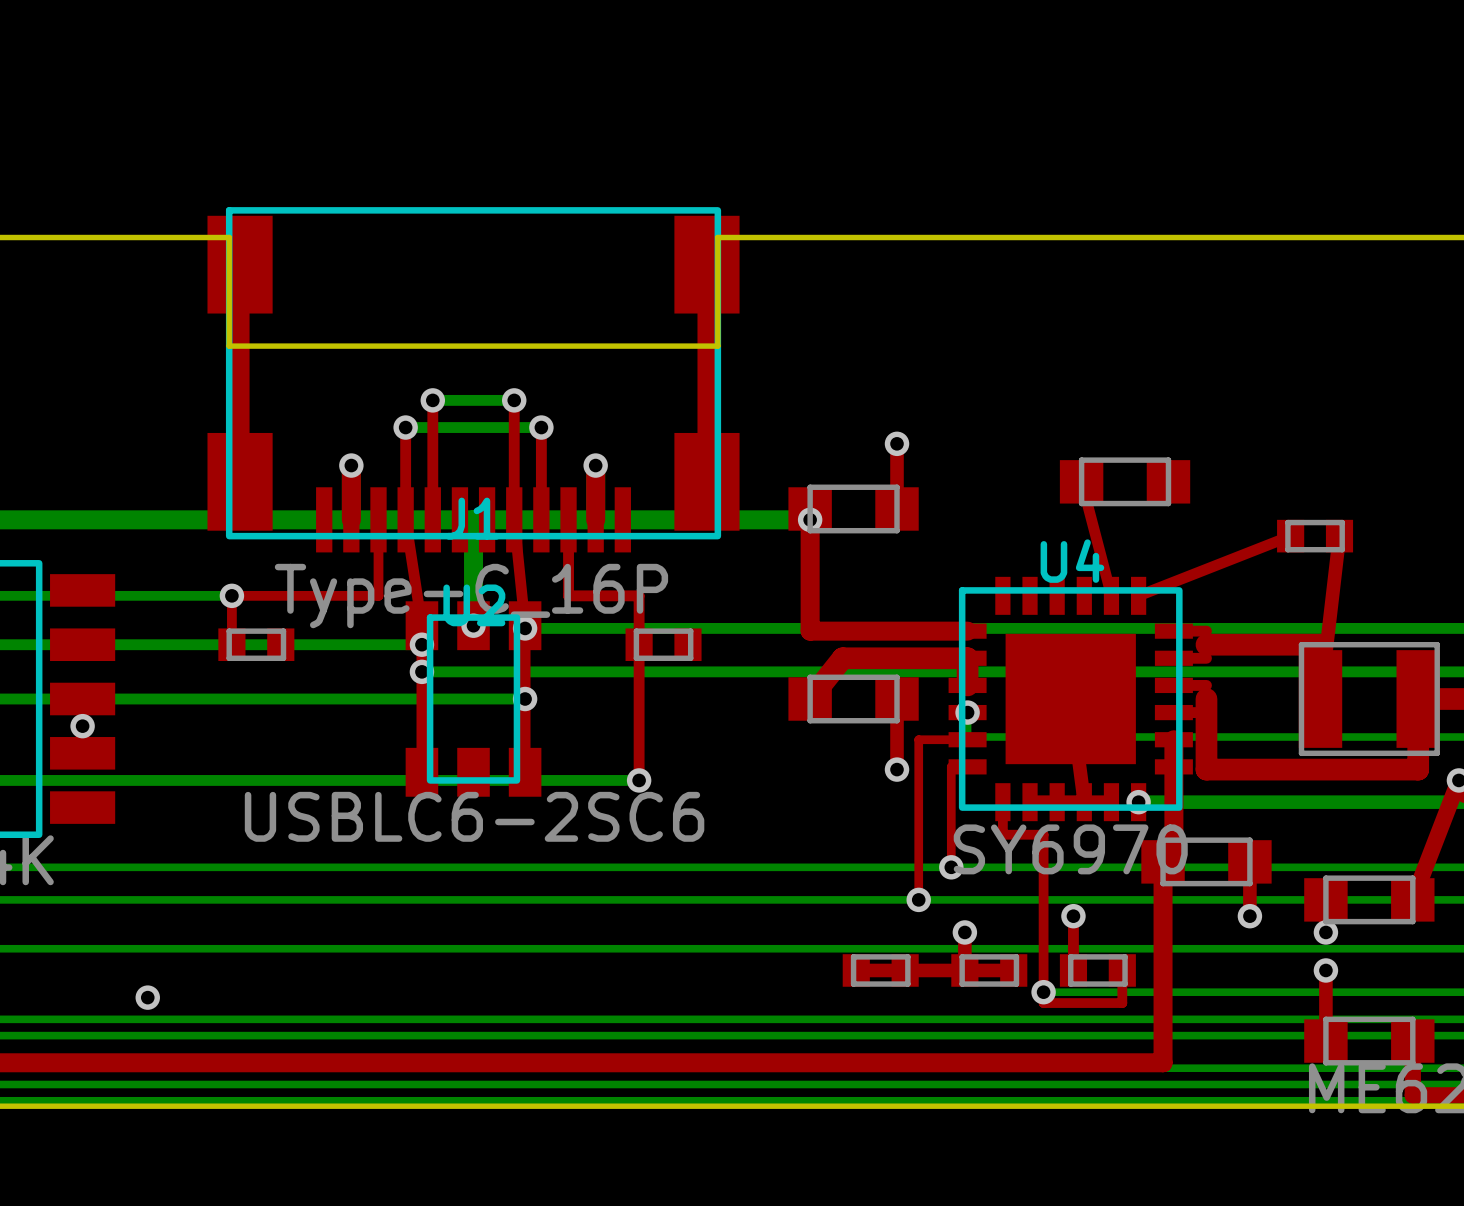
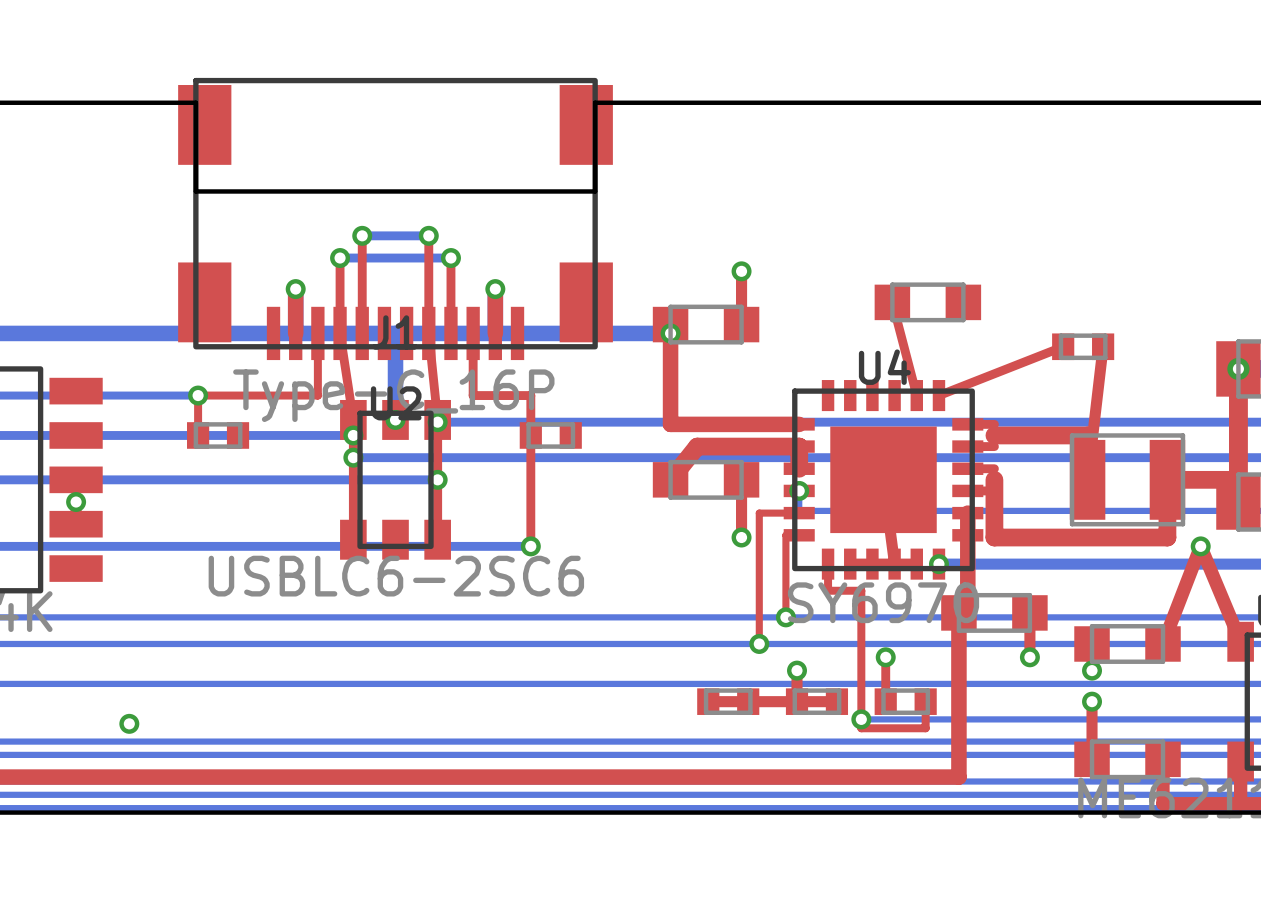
top track: (240, 264) (240, 481) -> none
top track: (706, 264) (706, 481) -> none

